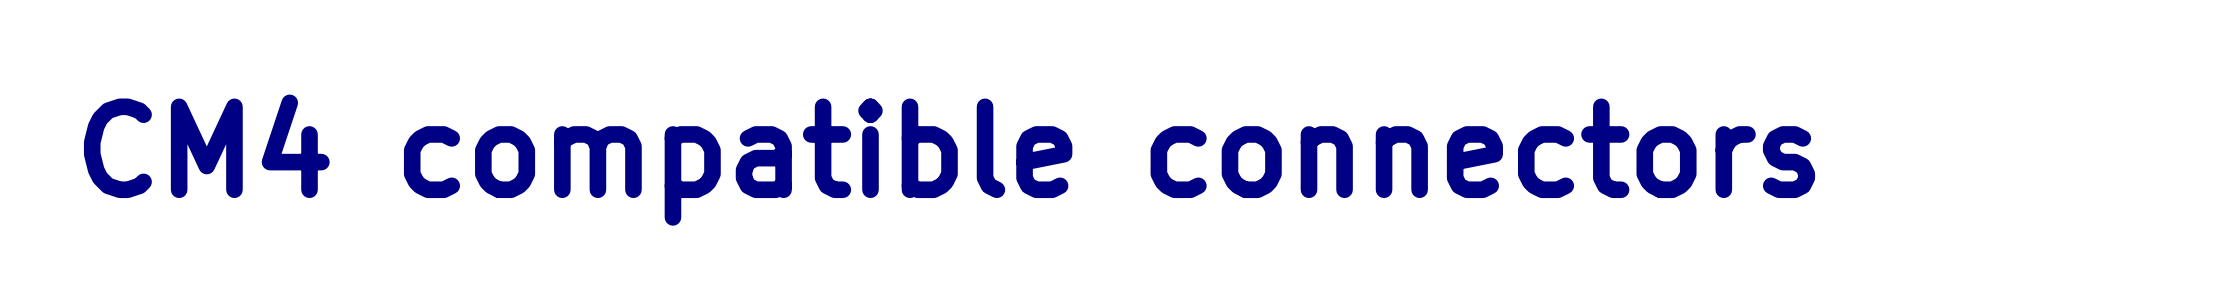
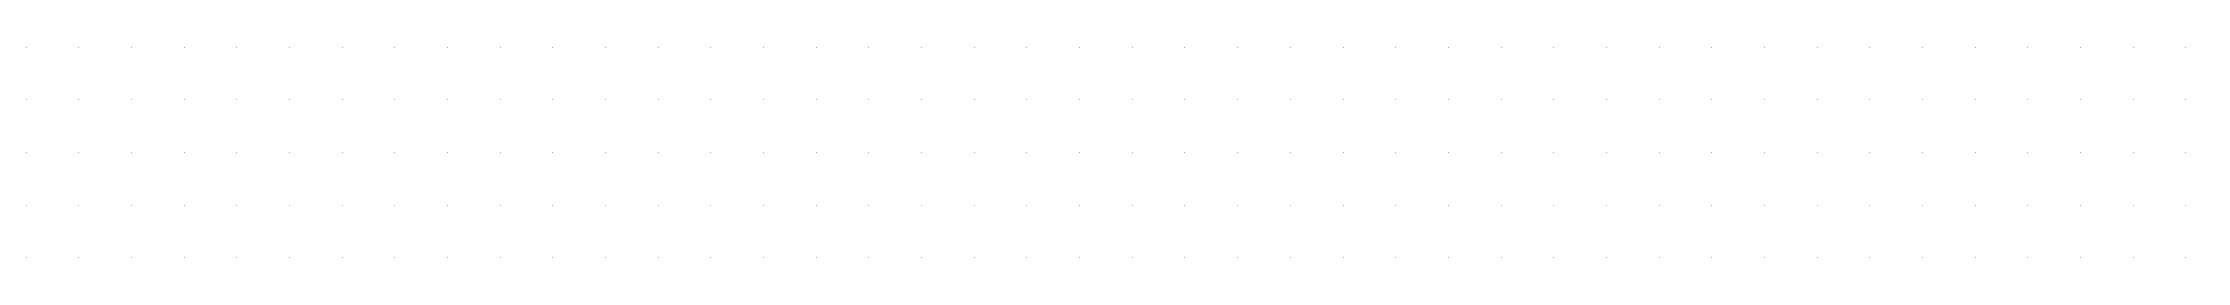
text: CM4 compatible connectors (949, 160) -> none

